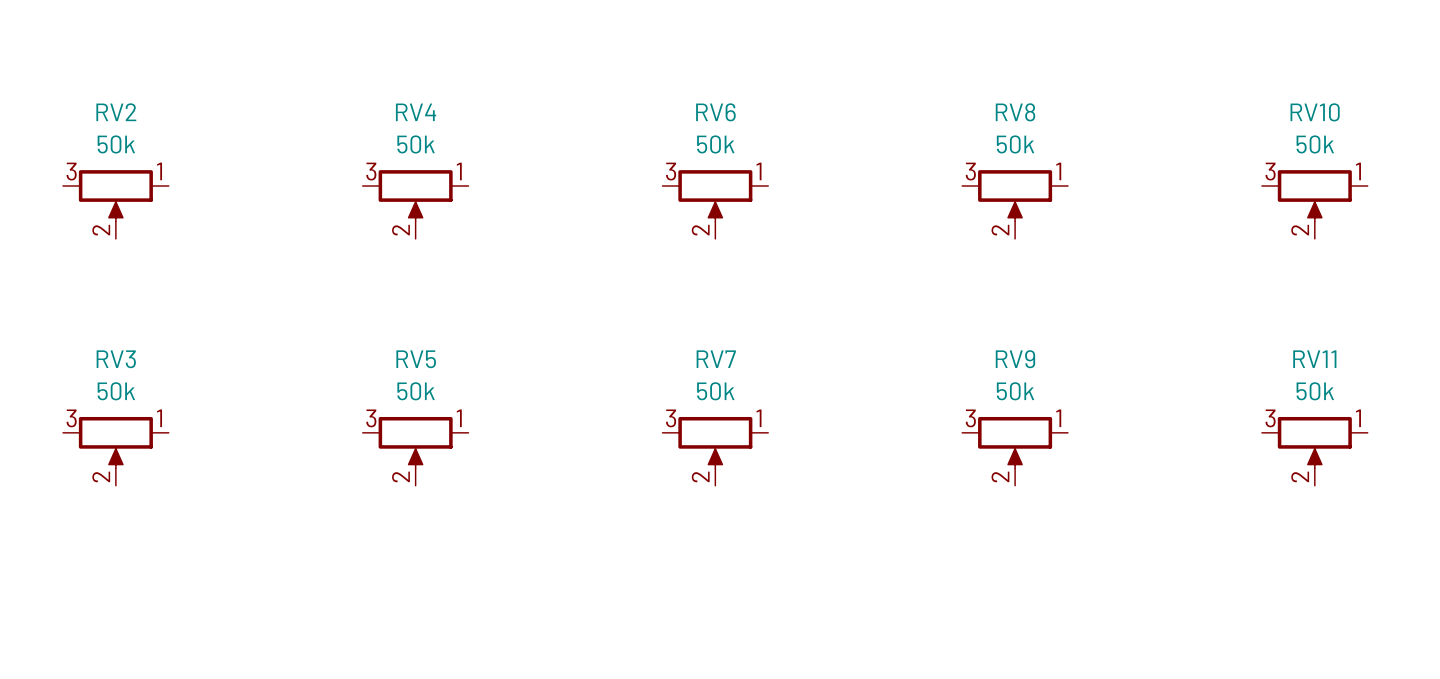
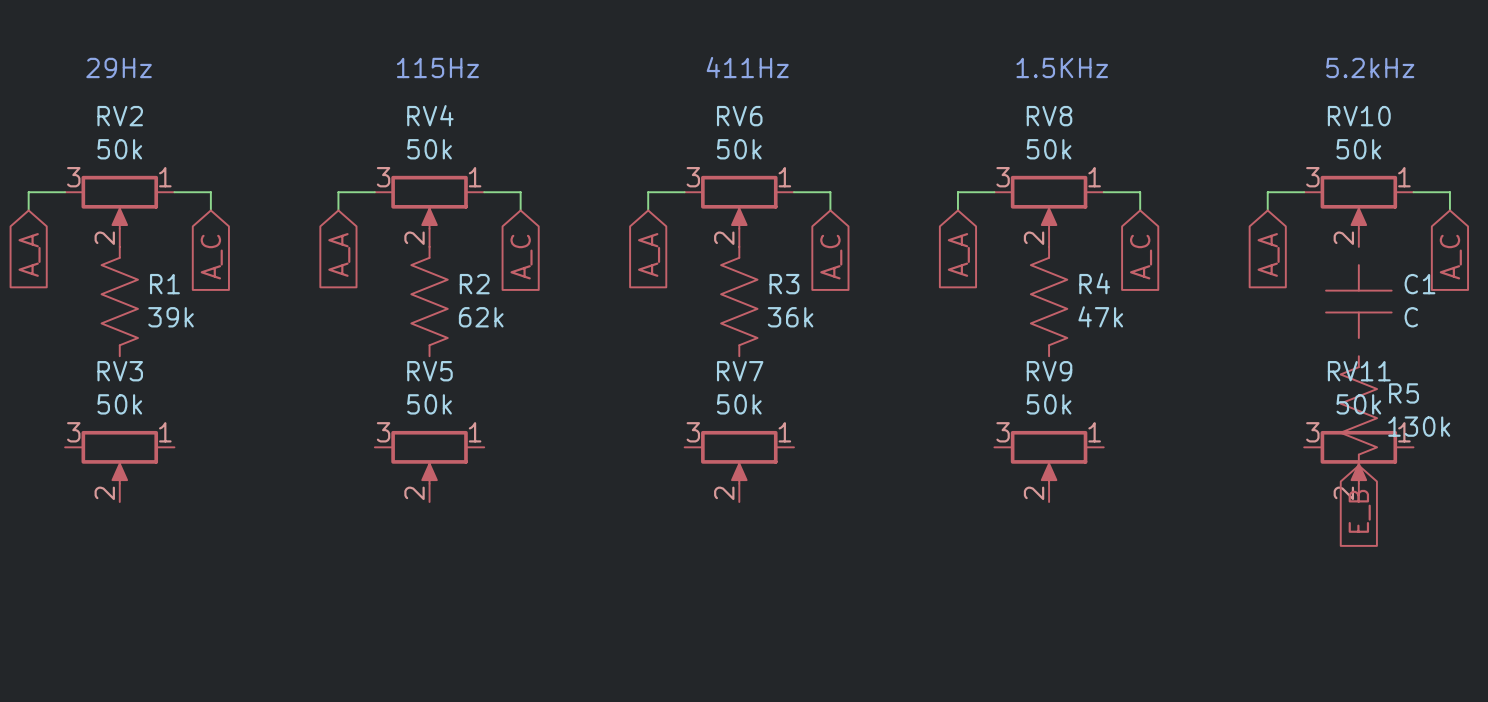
text: none -> 29Hz (119, 67)
text: none -> 115Hz (437, 67)
text: none -> 411Hz (747, 67)
text: none -> 1.5KHz (1062, 67)
text: none -> 5.2kHz (1370, 67)
wire: none -> (65, 192) (28, 192) (28, 210)
wire: none -> (174, 192) (210, 192) (210, 210)
wire: none -> (374, 192) (338, 192) (338, 210)
wire: none -> (484, 192) (520, 192) (520, 210)
wire: none -> (684, 192) (648, 192) (648, 210)
wire: none -> (793, 192) (830, 192) (830, 210)
wire: none -> (994, 192) (957, 192) (957, 210)
wire: none -> (1103, 192) (1140, 192) (1140, 210)
wire: none -> (1304, 192) (1267, 192) (1267, 210)
wire: none -> (1413, 192) (1449, 192) (1449, 210)
global label: none -> A_A (29, 254)
global label: none -> A_A (339, 254)
global label: none -> A_A (649, 254)
global label: none -> A_A (958, 254)
global label: none -> A_A (1268, 254)
global label: none -> A_C (211, 257)
global label: none -> A_C (521, 257)
global label: none -> A_C (831, 257)
global label: none -> A_C (1141, 257)
global label: none -> A_C (1450, 257)
R1: none -> 39k (119, 301)
R2: none -> 62k (429, 301)
R3: none -> 36k (739, 301)
R4: none -> 47k (1049, 301)
C1: none -> C (1358, 301)
R5: none -> 130k (1358, 410)
global label: none -> E_B (1359, 511)

